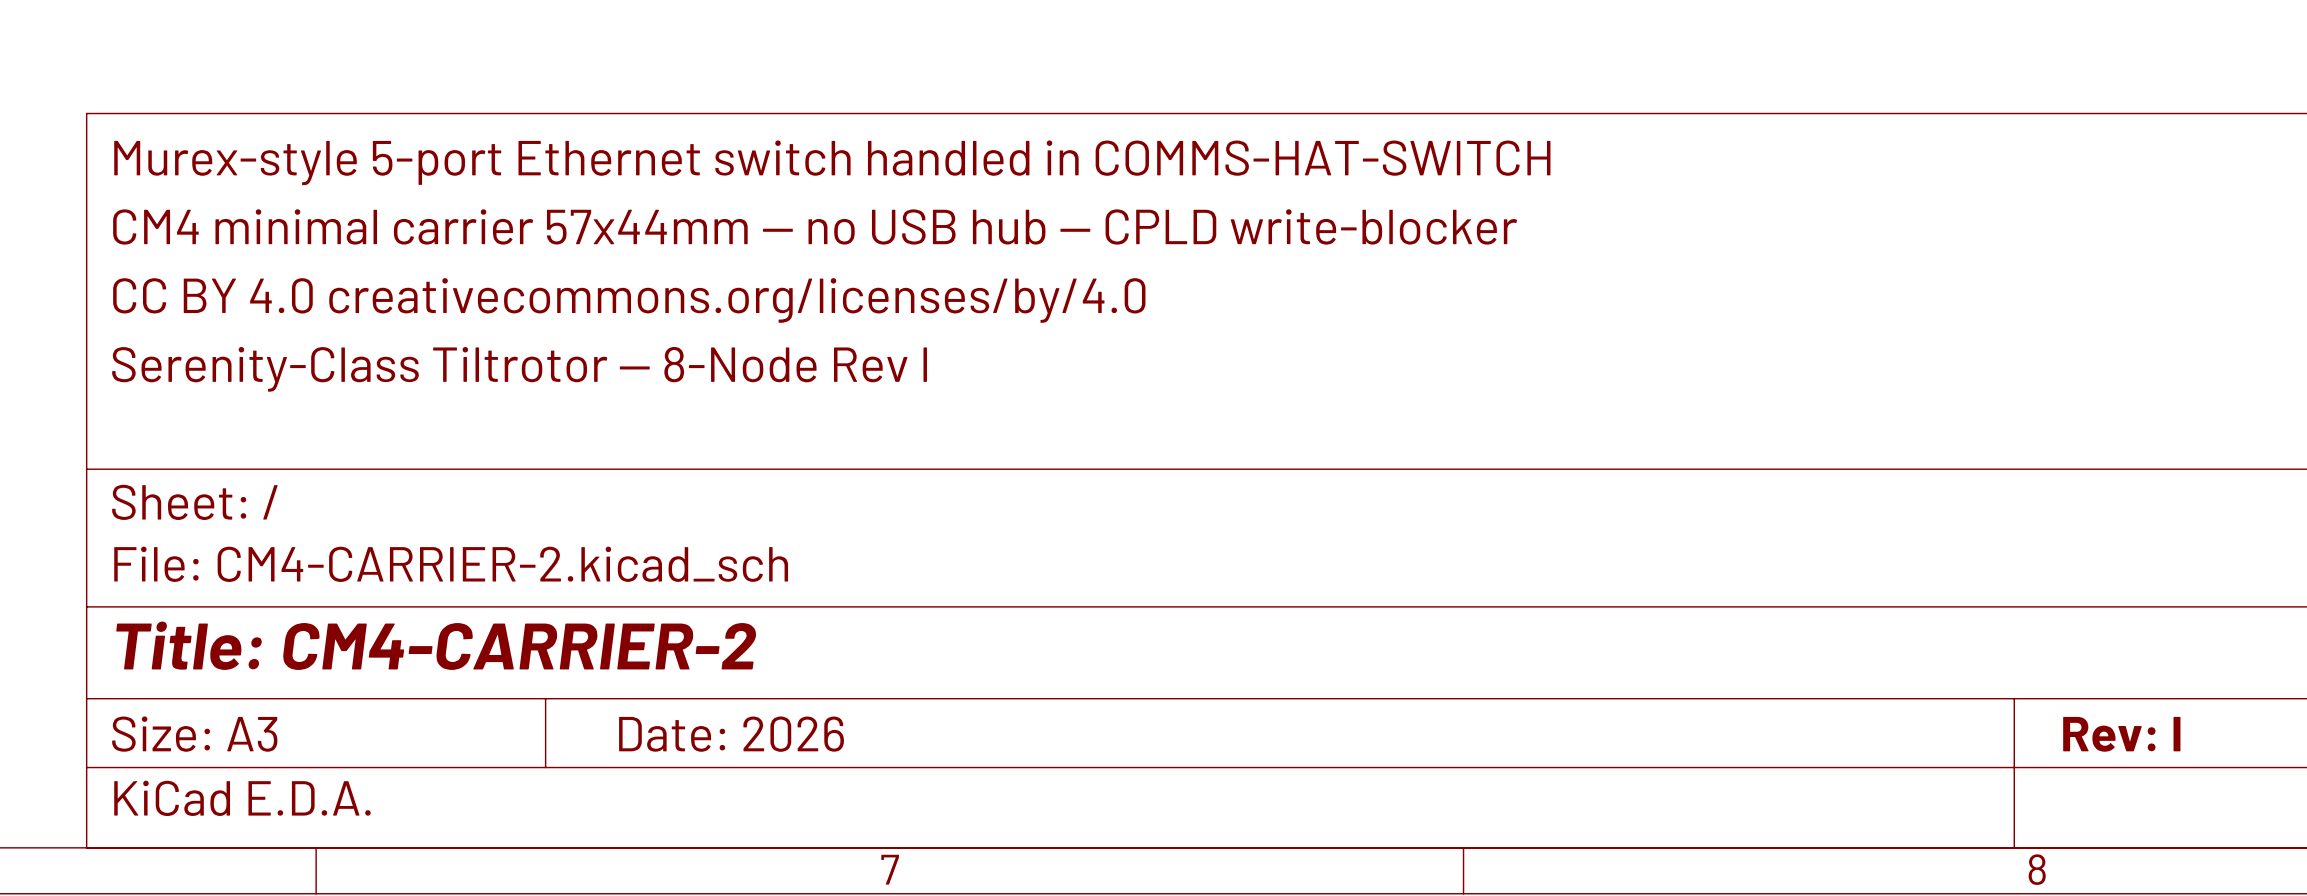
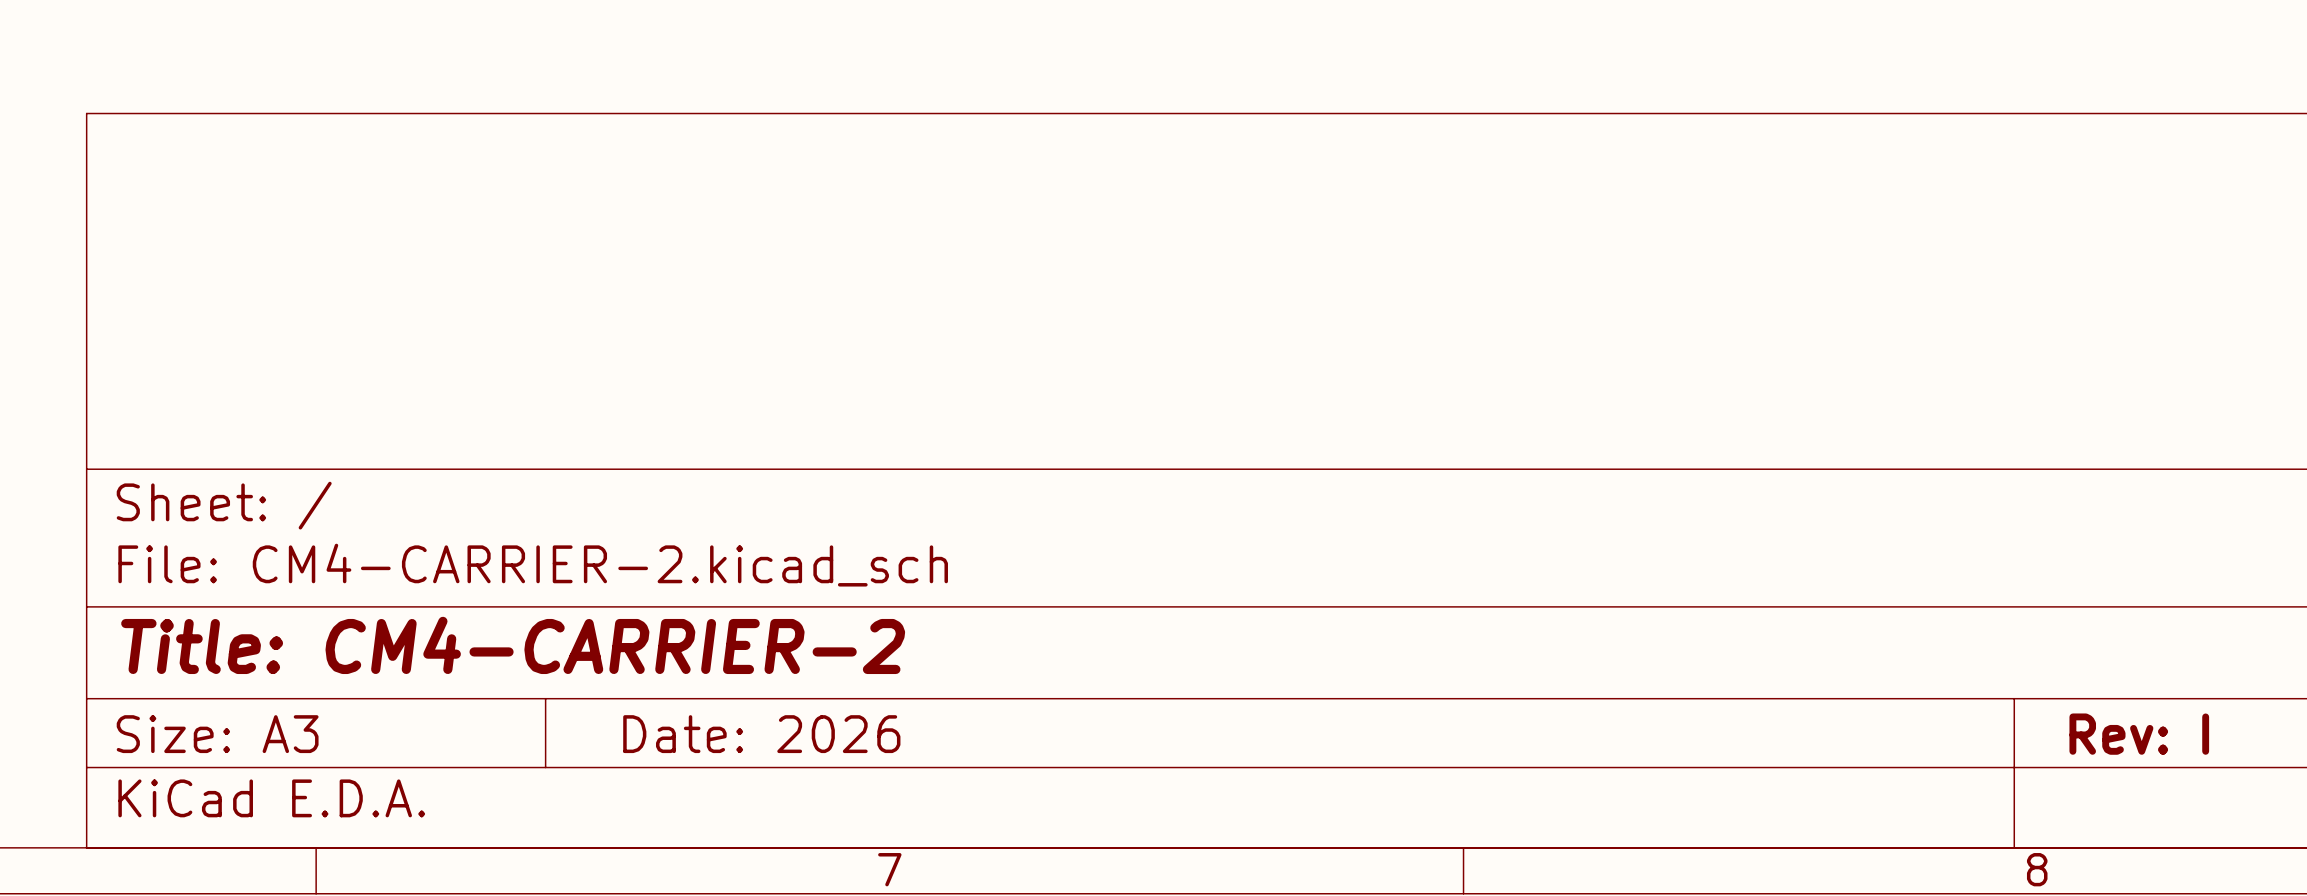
title block: Murex-style 5-port Ethernet switch handled in COMMS-HAT-SWITCH (832, 162) -> none
title block: CM4 minimal carrier 57x44mm — no USB hub — CPLD write-blocker (815, 226) -> none
title block: CC BY 4.0 creativecommons.org/licenses/by/4.0 (629, 300) -> none
title block: Serenity-Class Tiltrotor — 8-Node Rev I (519, 369) -> none

